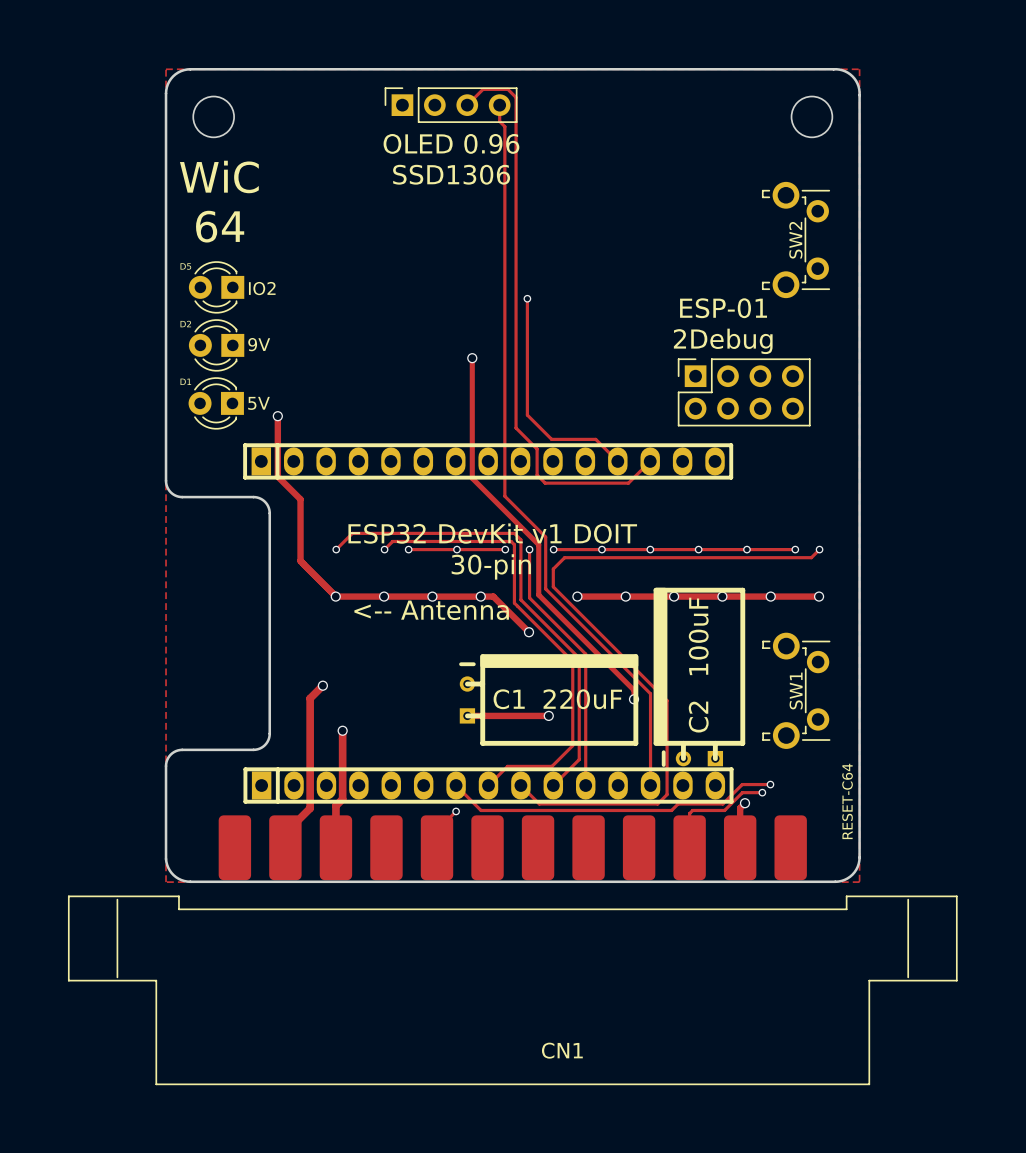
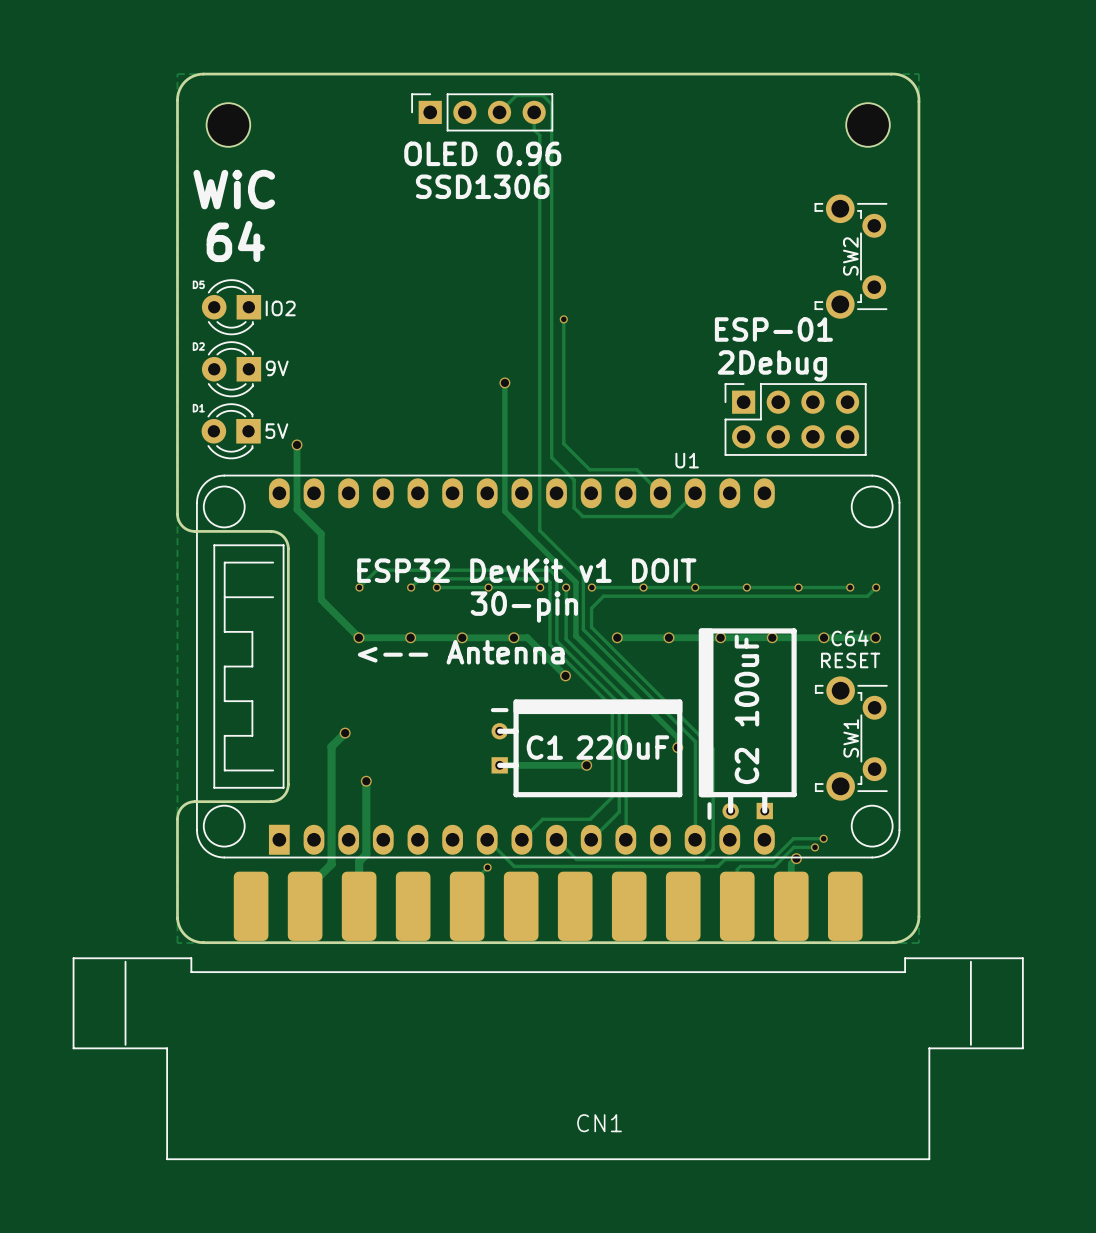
part: (488, 461) -> none
text: none -> C64 (849, 638)
text: none -> RESET (850, 660)
U1: none -> (548, 666)
part: (488, 785) -> none
SW1 value: RESET-C64 (847, 801) -> none

